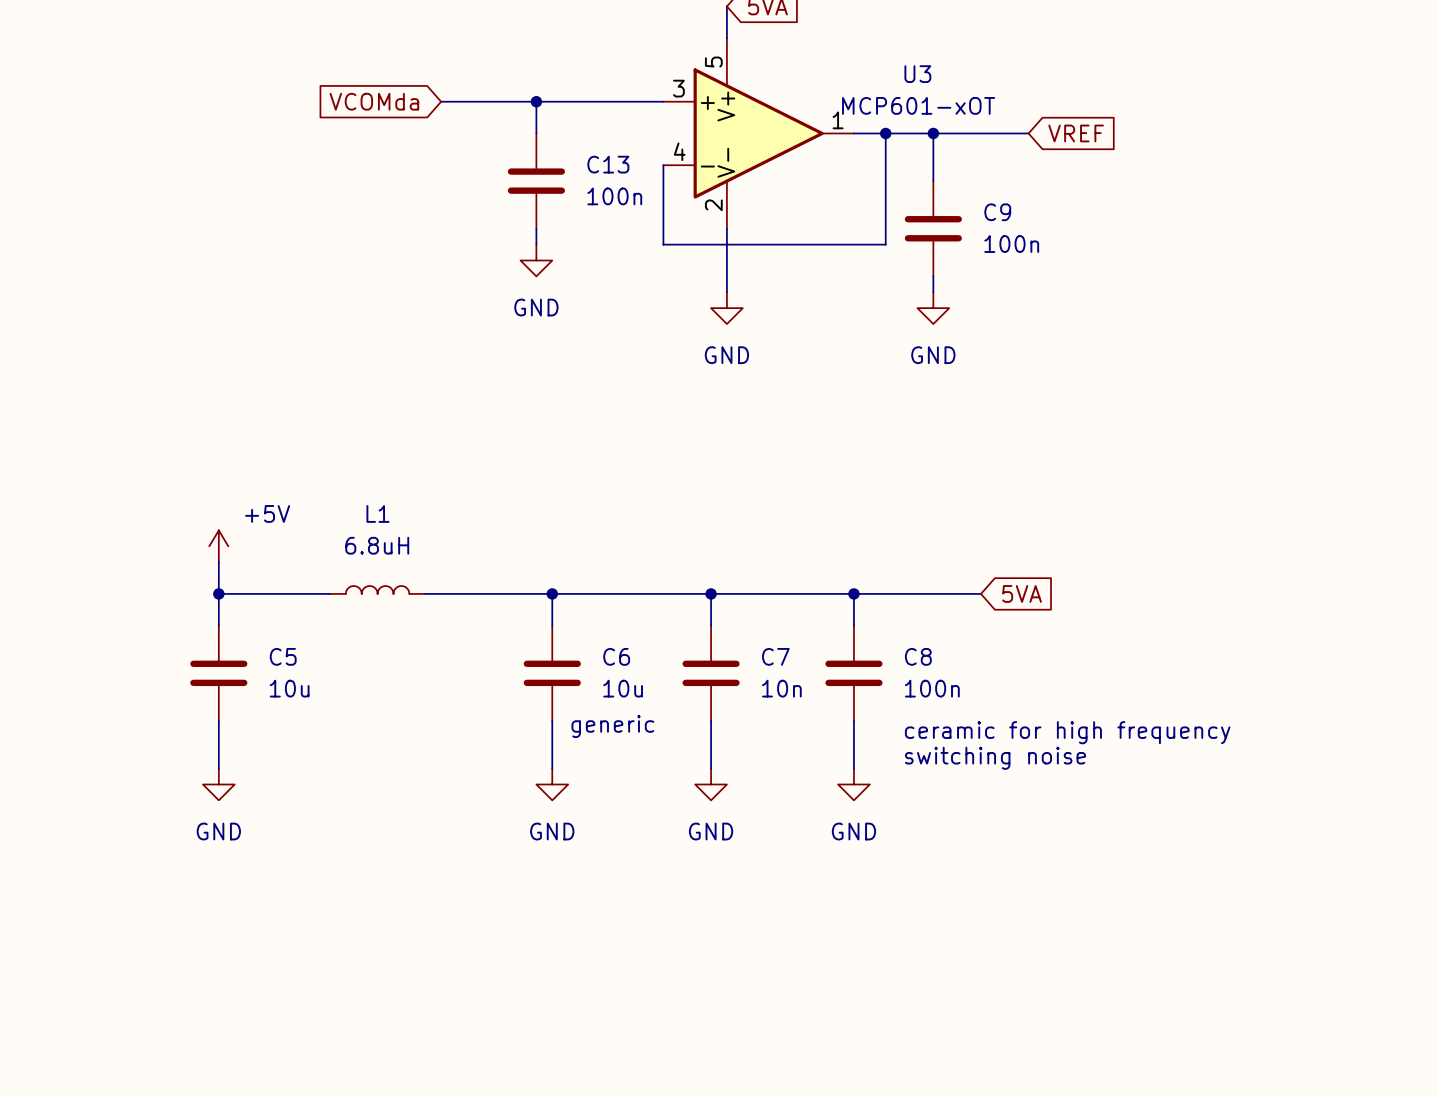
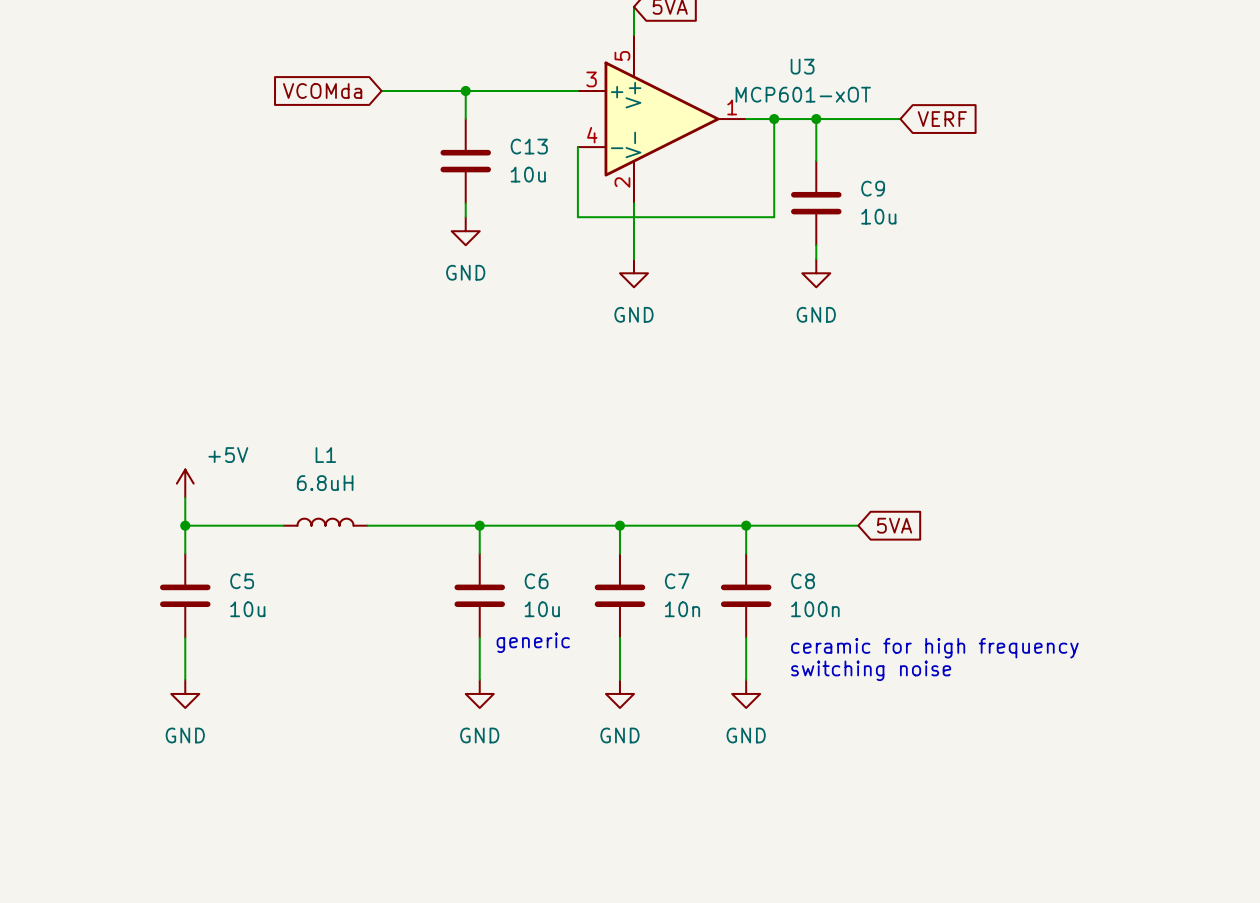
global label: VREF (1076, 133) -> VERF (942, 119)
C13 value: 100n (614, 196) -> 10u (528, 174)
C9 value: 100n (1011, 244) -> 10u (878, 216)

